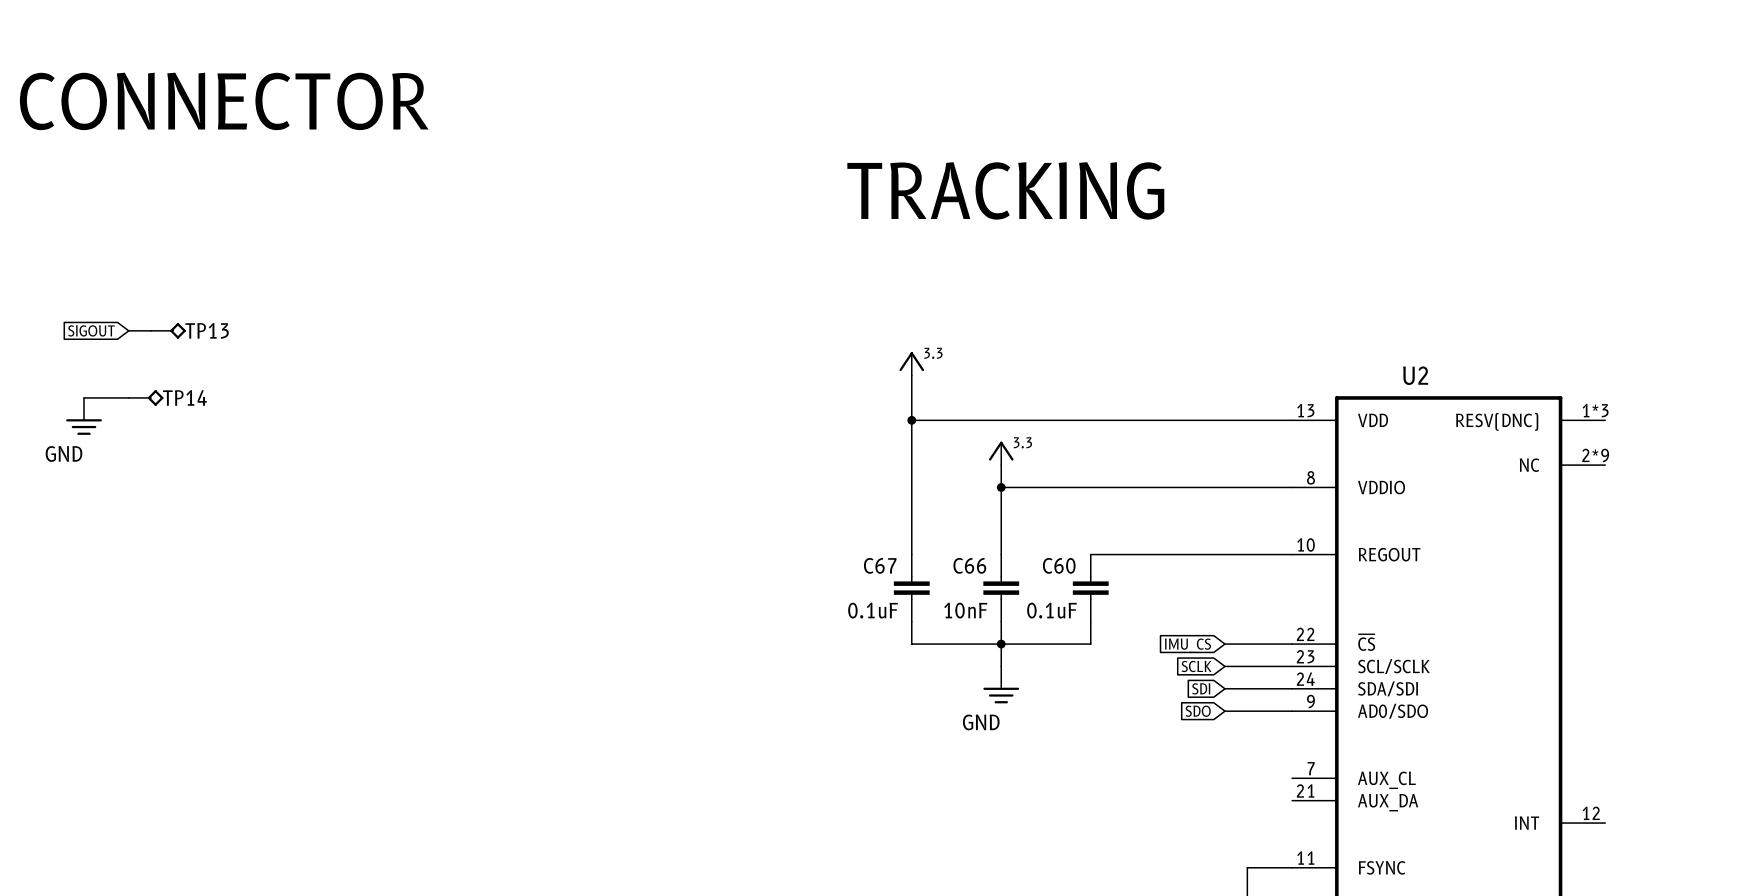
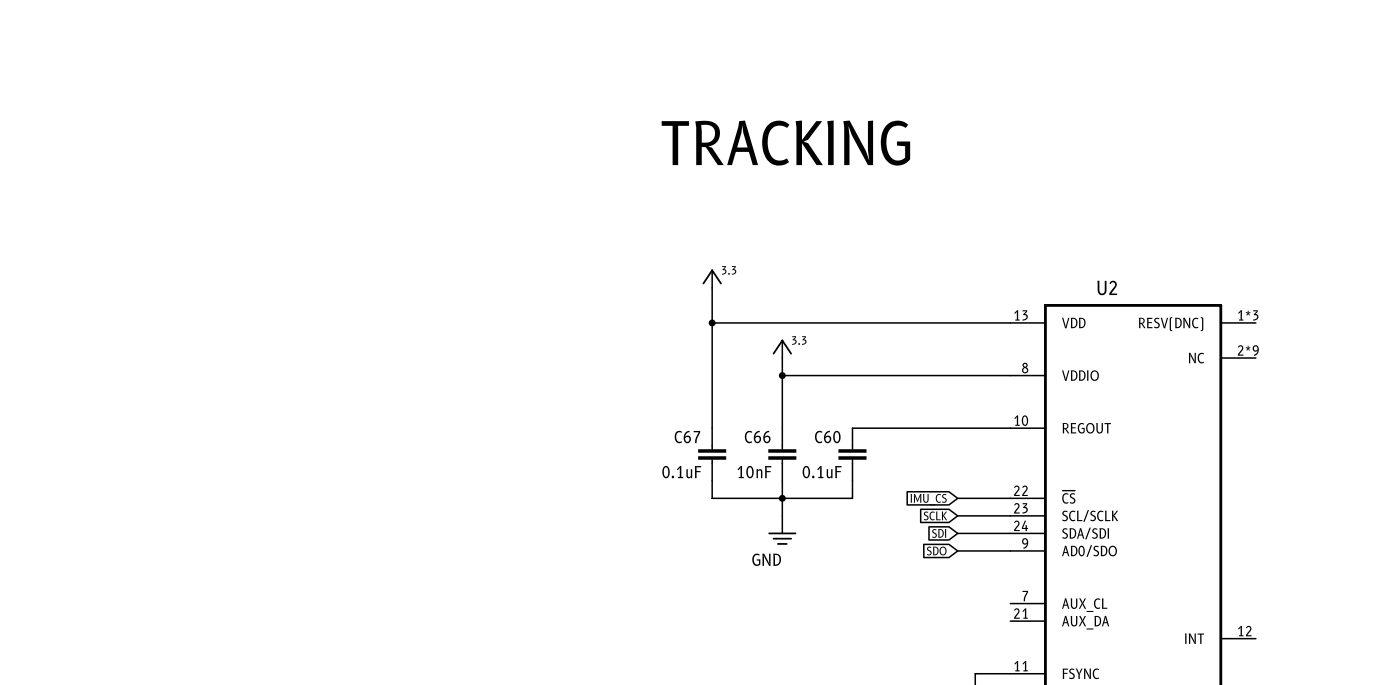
text: CONNECTOR (224, 101) -> none
global label: SIGOUT (91, 330) -> none
wire: (128, 330) (151, 330) -> none
TP13: (168, 330) -> none
wire: (84, 397) (128, 397) -> none
TP14: (146, 397) -> none
power symbol: GND (84, 416) -> none

